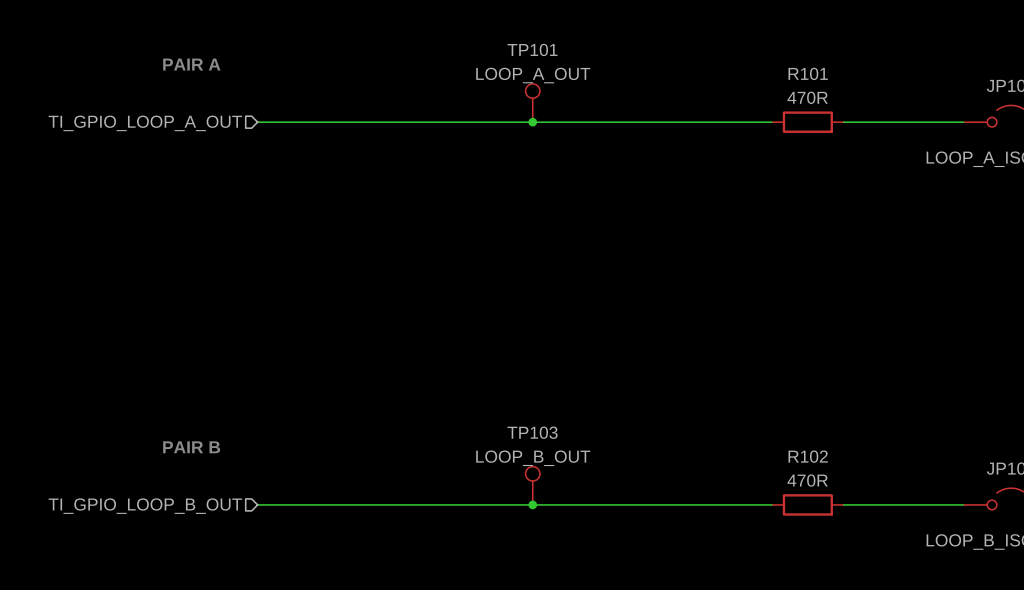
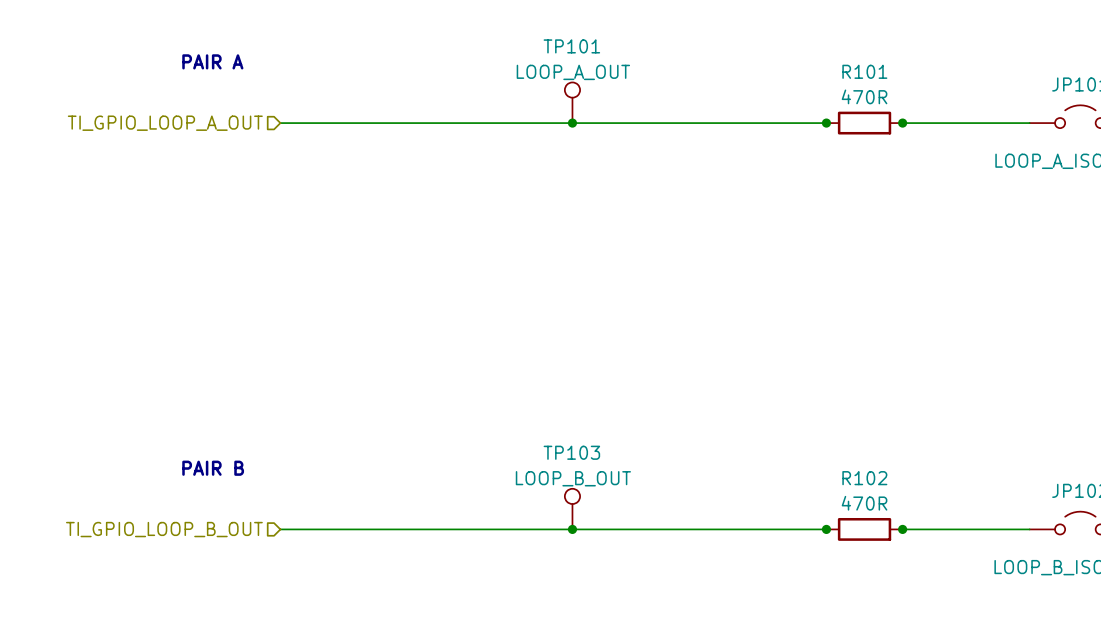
junction: none -> (826, 123)
junction: none -> (902, 123)
junction: none -> (826, 529)
junction: none -> (902, 529)

